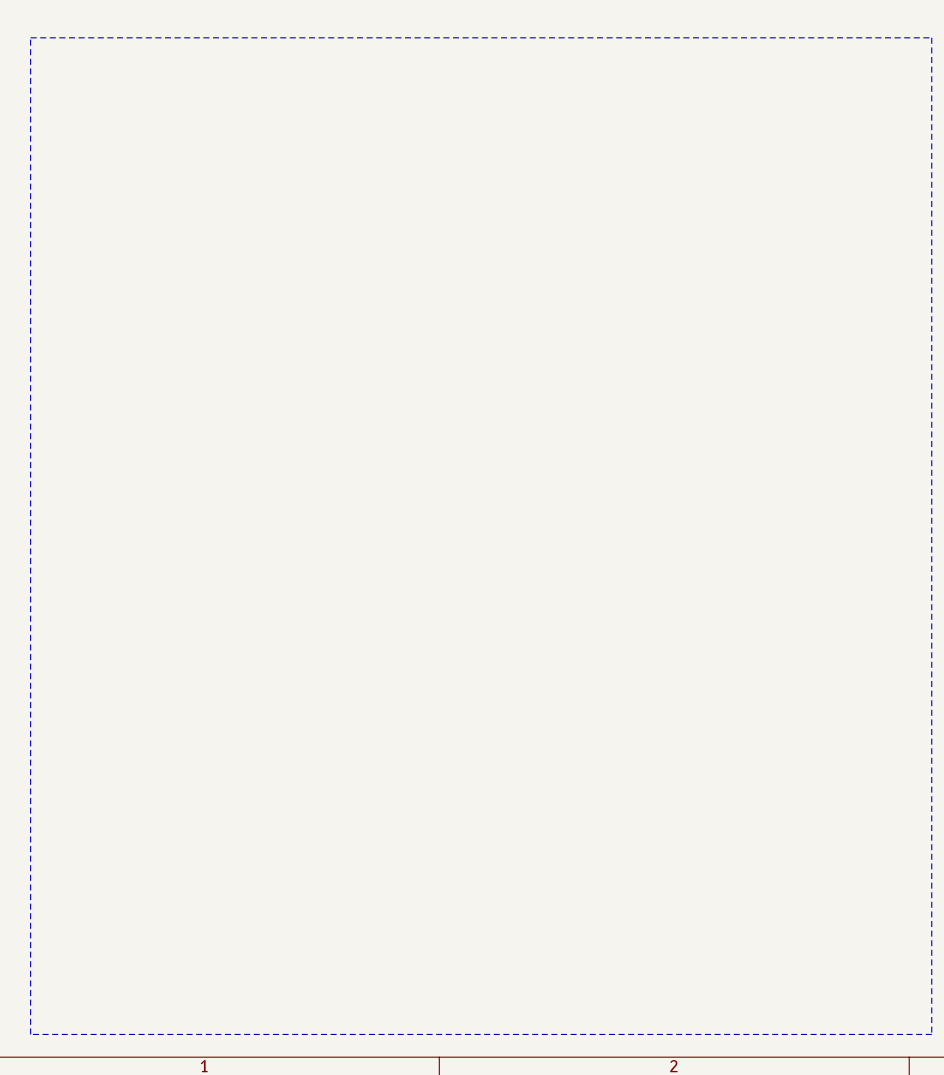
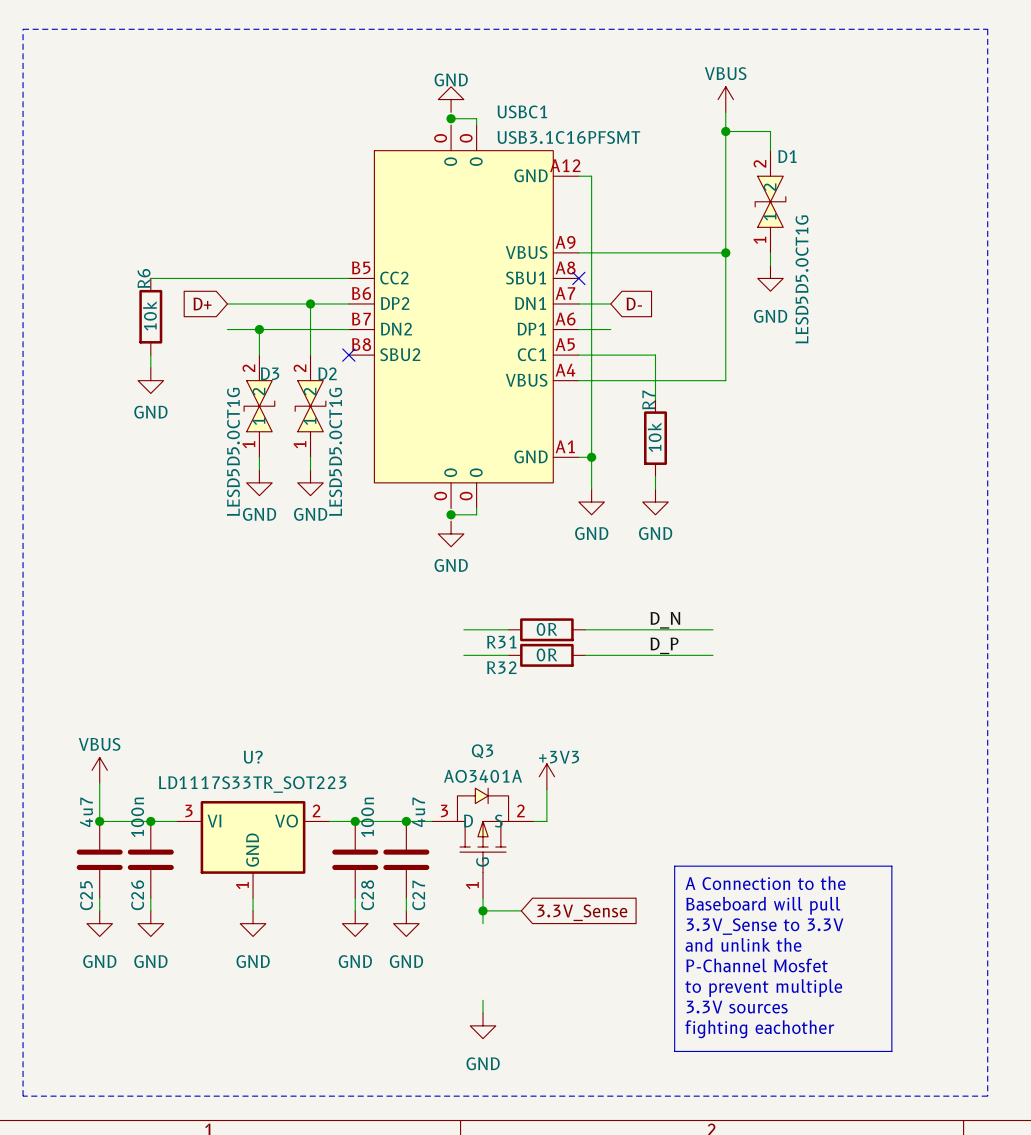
power symbol: none -> GND (451, 99)
power symbol: none -> VBUS (725, 99)
wire: none -> (725, 112) (725, 380) (578, 380)
wire: none -> (451, 118) (476, 118) (476, 125)
junction: none -> (451, 118)
wire: none -> (725, 131) (770, 131) (770, 150)
junction: none -> (725, 131)
wire: none -> (578, 176) (591, 176) (591, 457)
D1: none -> LESD5D5.0CT1G (770, 201)
wire: none -> (578, 252) (725, 252)
junction: none -> (725, 252)
wire: none -> (770, 252) (770, 265)
wire: none -> (150, 278) (348, 278)
no-connect mark: none -> (578, 278)
power symbol: none -> GND (770, 278)
global label: none -> D+ (202, 304)
wire: none -> (227, 303) (348, 303)
wire: none -> (310, 303) (310, 355)
junction: none -> (310, 303)
wire: none -> (578, 303) (610, 303)
global label: none -> D- (634, 304)
R6: none -> 10k (150, 316)
USBC1: none -> USB3.1C16PFSMT (463, 316)
wire: none -> (227, 329) (348, 329)
wire: none -> (259, 329) (259, 355)
junction: none -> (259, 329)
wire: none -> (578, 329) (610, 329)
wire: none -> (150, 355) (150, 367)
no-connect mark: none -> (348, 355)
wire: none -> (578, 355) (655, 355) (655, 399)
power symbol: none -> GND (150, 380)
D3: none -> LESD5D5.0CT1G (259, 406)
D2: none -> LESD5D5.0CT1G (310, 406)
R7: none -> 10k (655, 438)
wire: none -> (259, 457) (259, 470)
wire: none -> (310, 457) (310, 470)
wire: none -> (578, 457) (591, 457)
wire: none -> (591, 457) (591, 489)
junction: none -> (591, 457)
wire: none -> (655, 476) (655, 489)
power symbol: none -> GND (259, 482)
power symbol: none -> GND (310, 482)
power symbol: none -> GND (591, 502)
power symbol: none -> GND (655, 502)
wire: none -> (476, 508) (476, 514) (451, 514)
junction: none -> (451, 514)
power symbol: none -> GND (451, 533)
label: none -> D_N (665, 620)
wire: none -> (463, 629) (508, 629)
R31: none -> 0R (546, 629)
wire: none -> (585, 629) (712, 629)
label: none -> D_P (664, 645)
wire: none -> (463, 655) (508, 655)
R32: none -> 0R (546, 655)
wire: none -> (585, 655) (712, 655)
power symbol: none -> VBUS (99, 770)
power symbol: none -> +3V3 (546, 776)
wire: none -> (99, 783) (99, 821) (176, 821)
wire: none -> (546, 789) (546, 821) (534, 821)
junction: none -> (99, 821)
junction: none -> (150, 821)
wire: none -> (329, 821) (431, 821)
junction: none -> (355, 821)
junction: none -> (406, 821)
Q3: none -> AO3401A (483, 843)
U?: none -> LD1117S33TR_SOT223 (253, 849)
C25: none -> 4u7 (99, 859)
C26: none -> 100n (150, 859)
C28: none -> 100n (355, 859)
C27: none -> 4u7 (406, 859)
line: none -> (674, 866) (891, 866) (891, 1051) (674, 1051) (674, 866)
text: none -> A Connection to the (765, 883)
wire: none -> (99, 898) (99, 910)
wire: none -> (150, 898) (150, 910)
wire: none -> (253, 898) (253, 910)
wire: none -> (355, 898) (355, 910)
wire: none -> (406, 898) (406, 910)
wire: none -> (483, 898) (483, 923)
text: none -> Baseboard will pull (763, 905)
wire: none -> (483, 910) (521, 910)
junction: none -> (483, 910)
global label: none -> 3.3V_Sense (582, 912)
power symbol: none -> GND (99, 923)
power symbol: none -> GND (150, 923)
power symbol: none -> GND (253, 923)
power symbol: none -> GND (355, 923)
power symbol: none -> GND (406, 923)
text: none -> 3.3V_Sense to 3.3V (765, 926)
text: none -> and unlink the (743, 944)
text: none -> P-Channel Mosfet (757, 965)
text: none -> to prevent multiple (763, 988)
wire: none -> (483, 1000) (483, 1013)
text: none -> 3.3V sources (737, 1007)
power symbol: none -> GND (483, 1025)
text: none -> fighting eachother (759, 1029)

